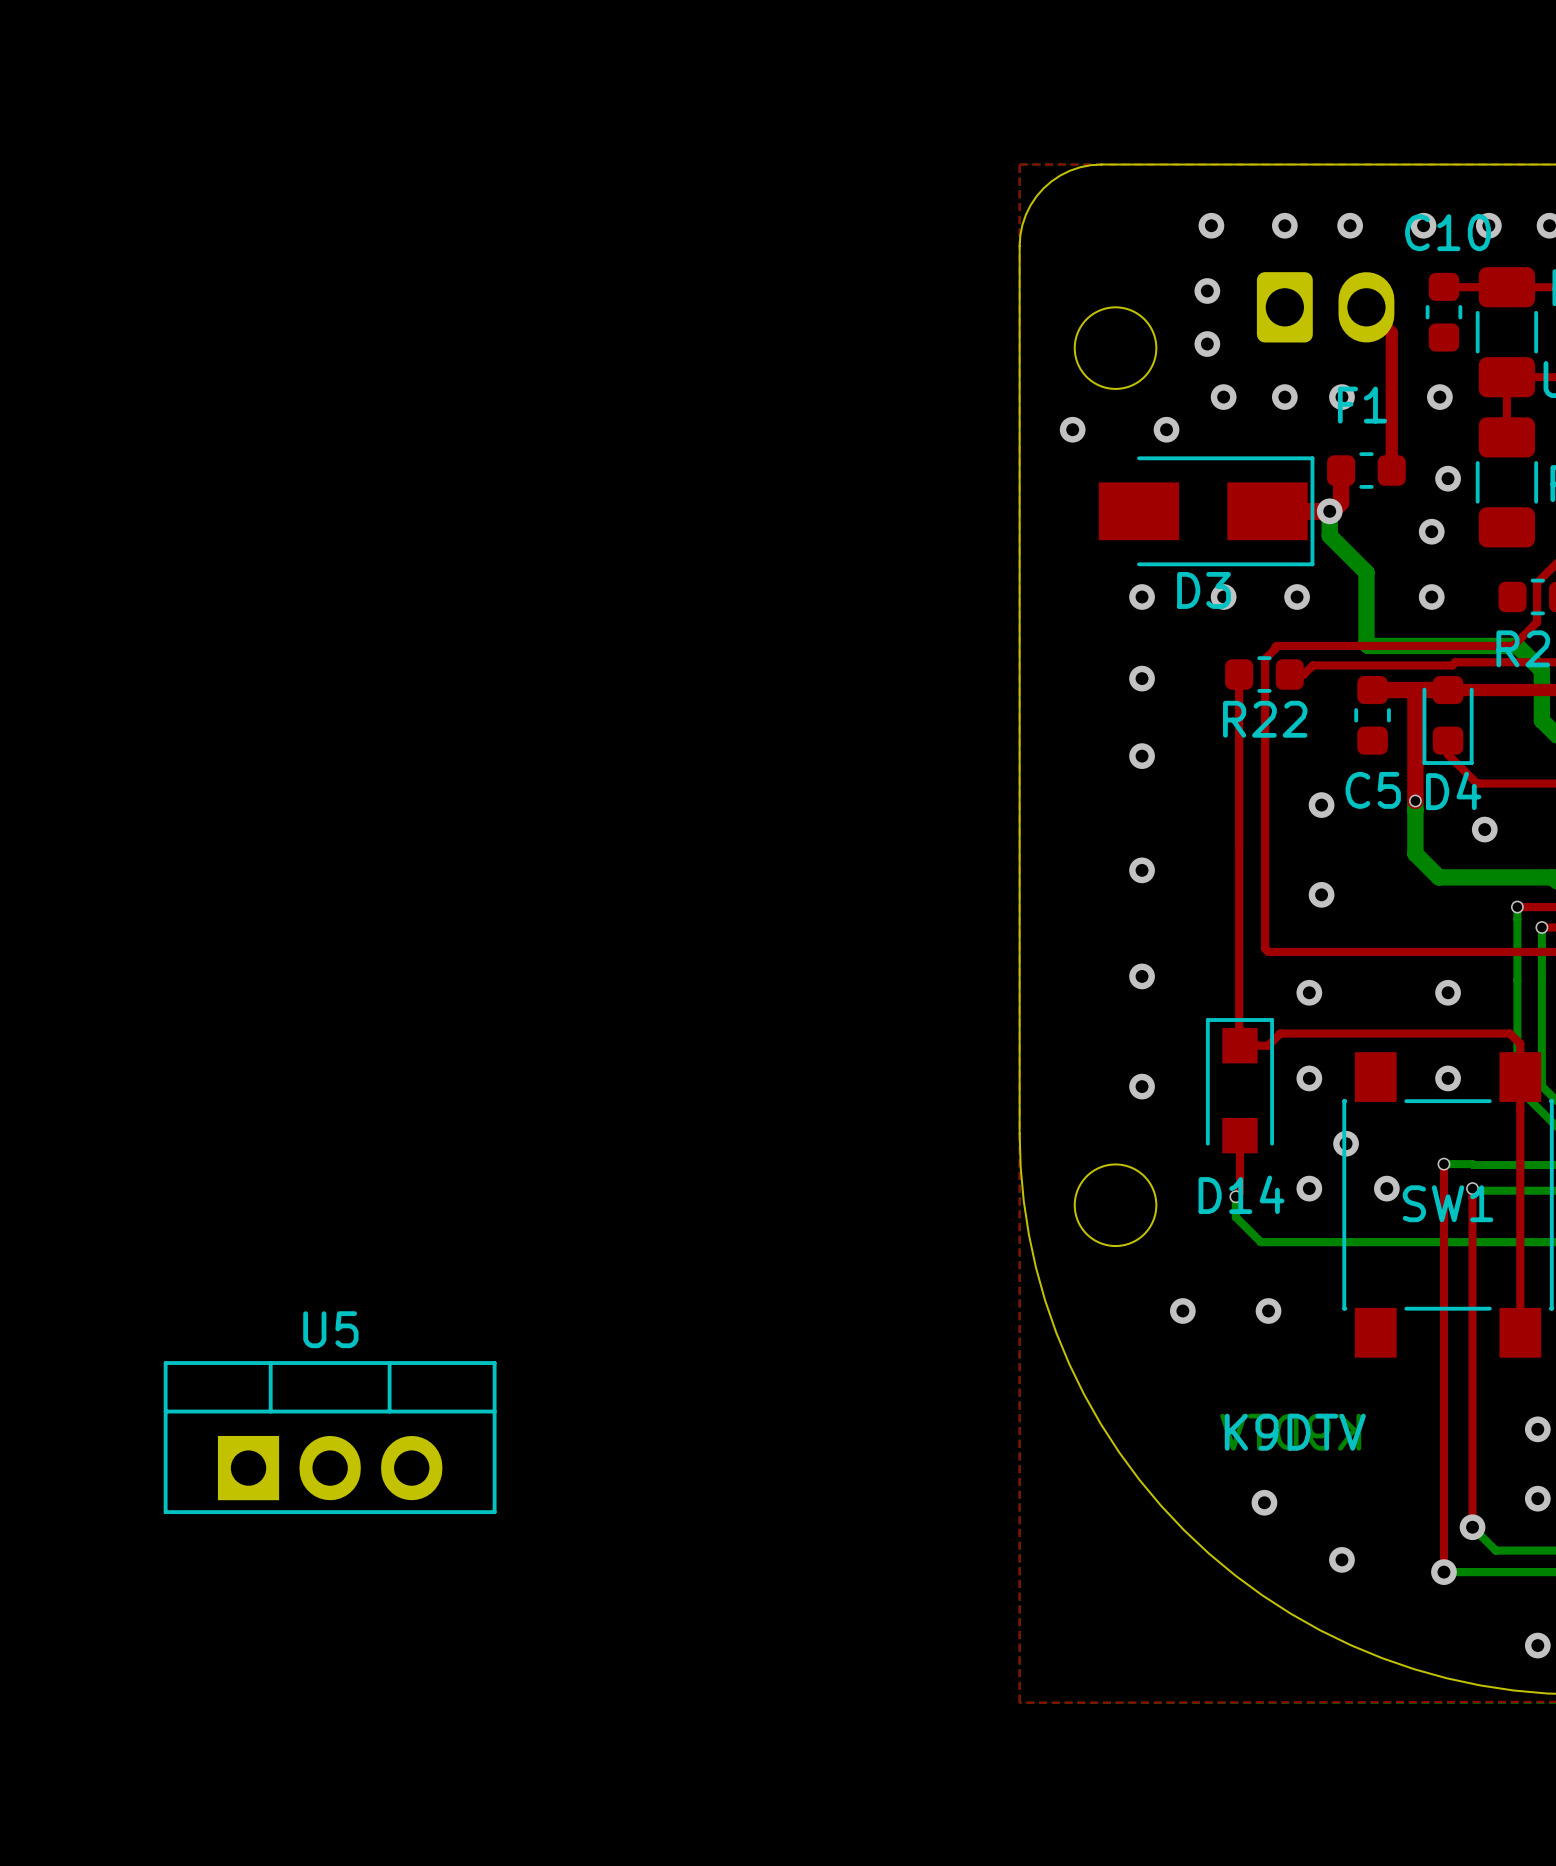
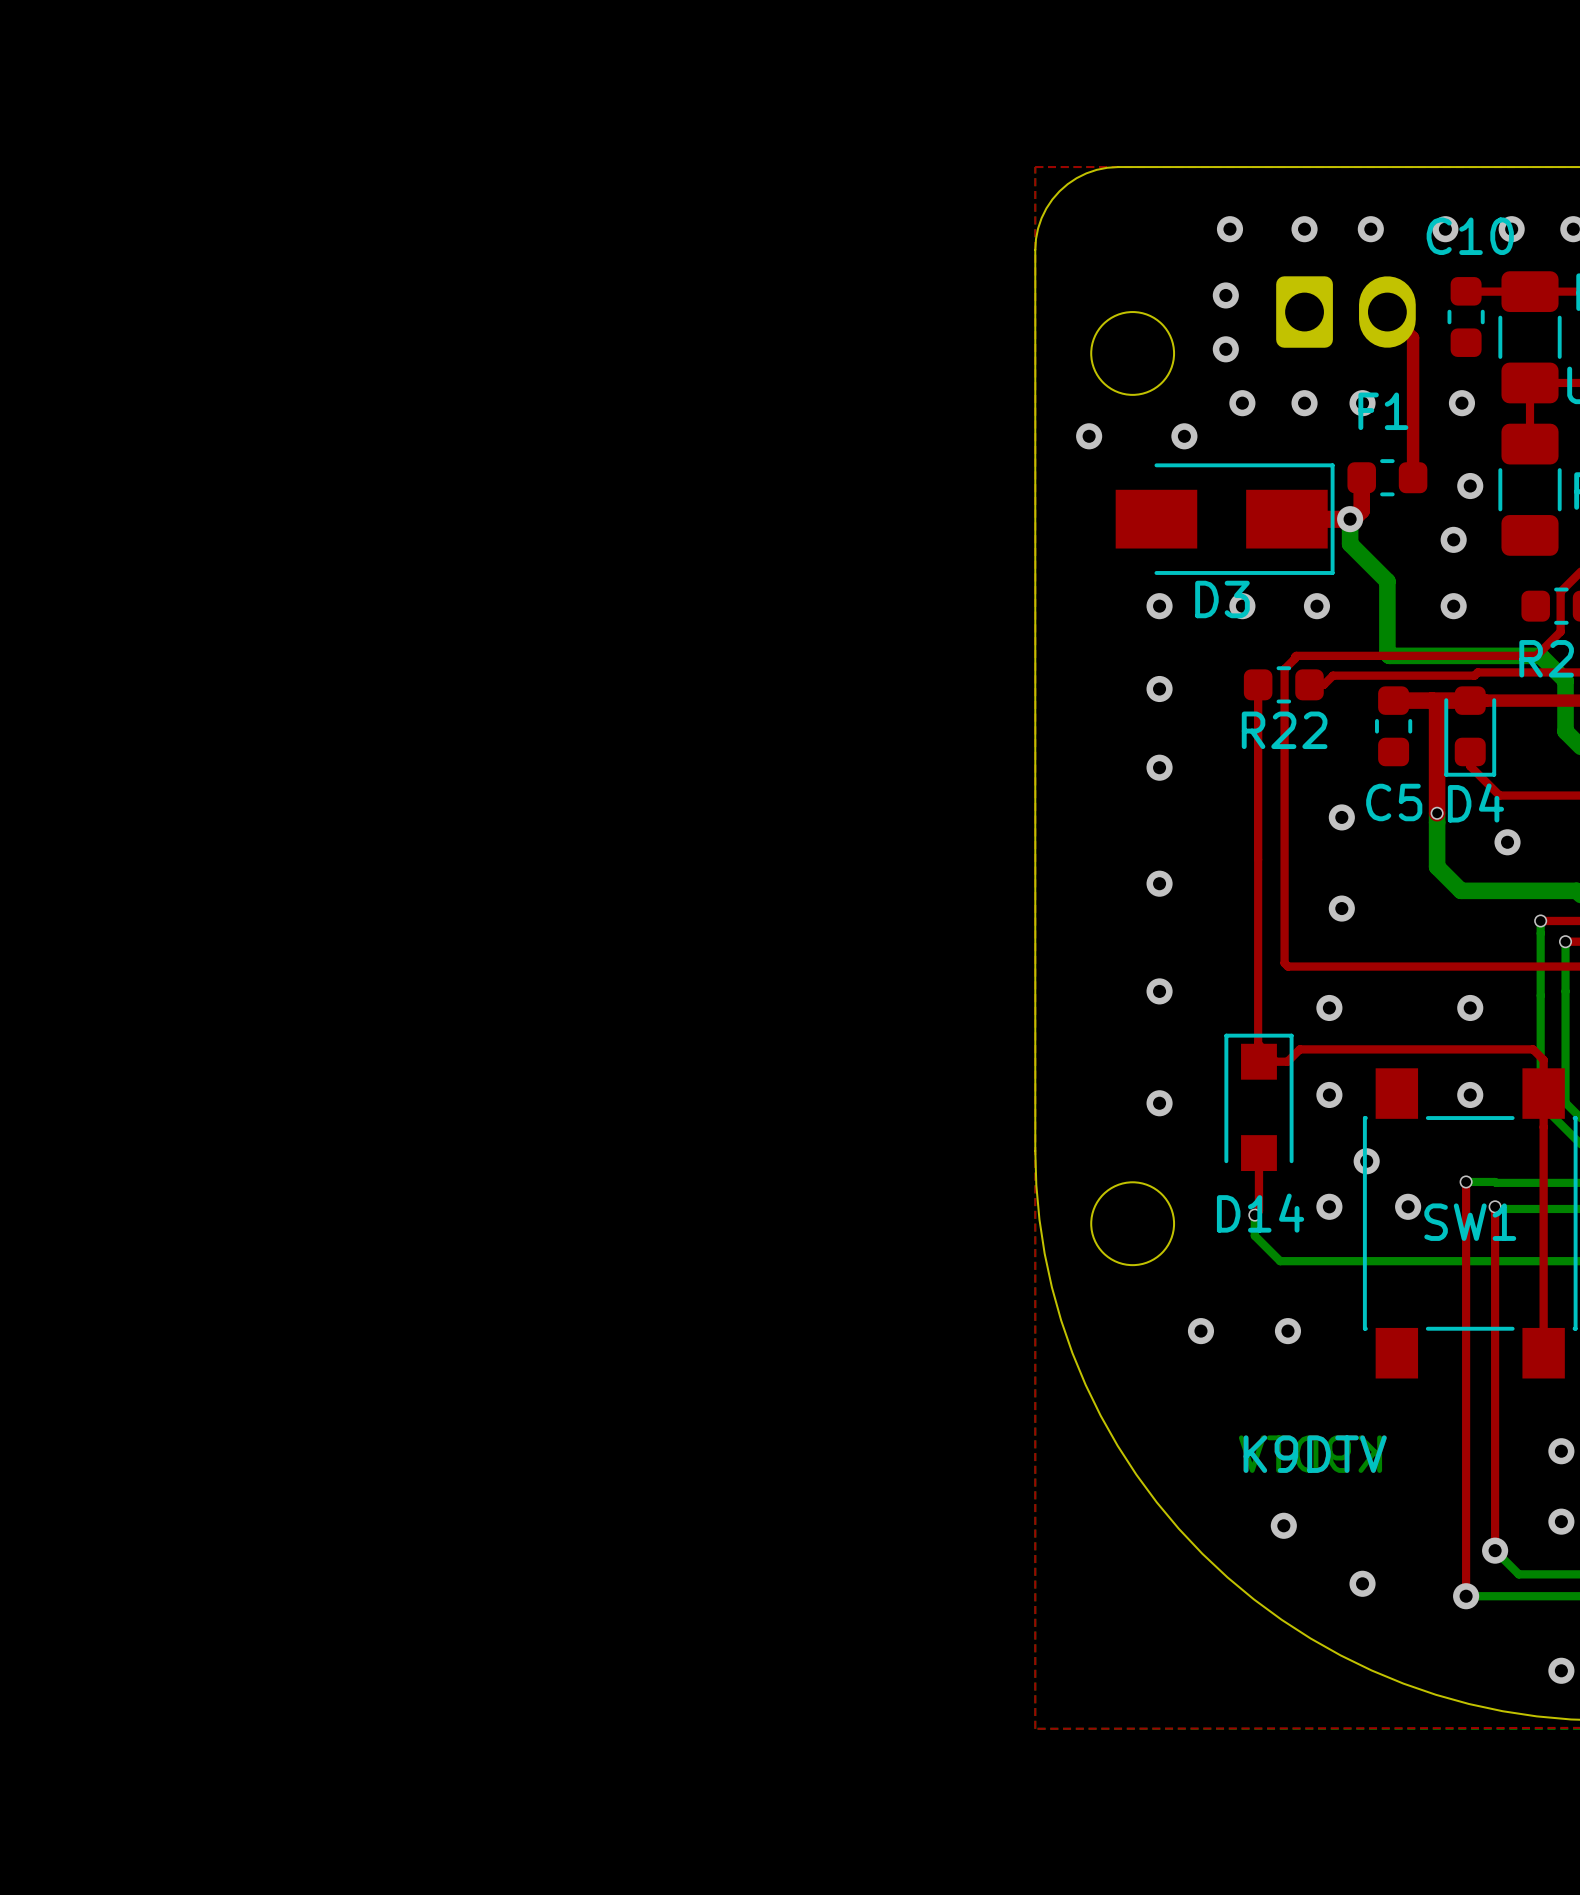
U5: (330, 1437) -> none

